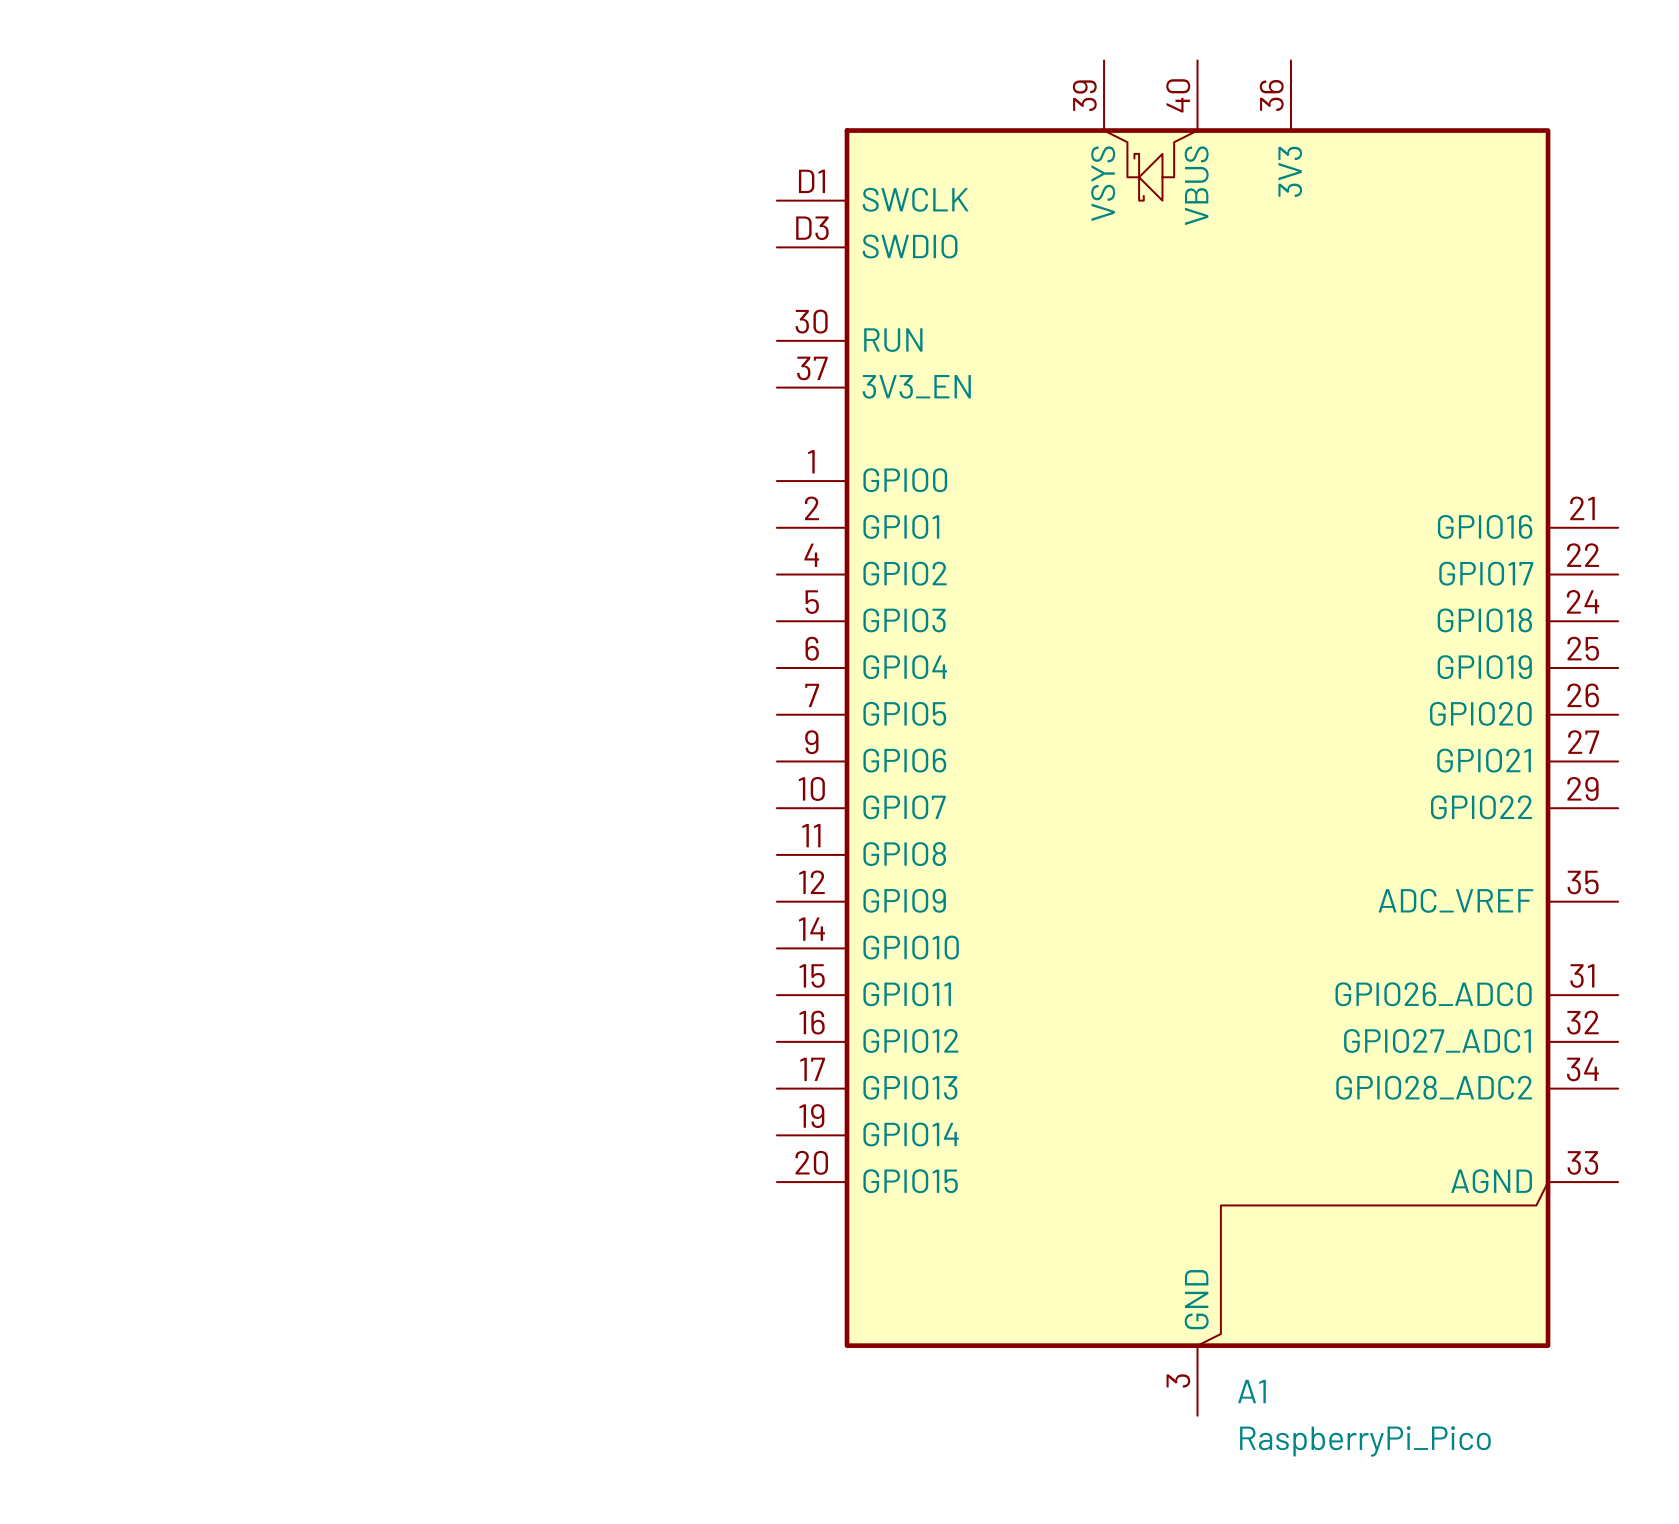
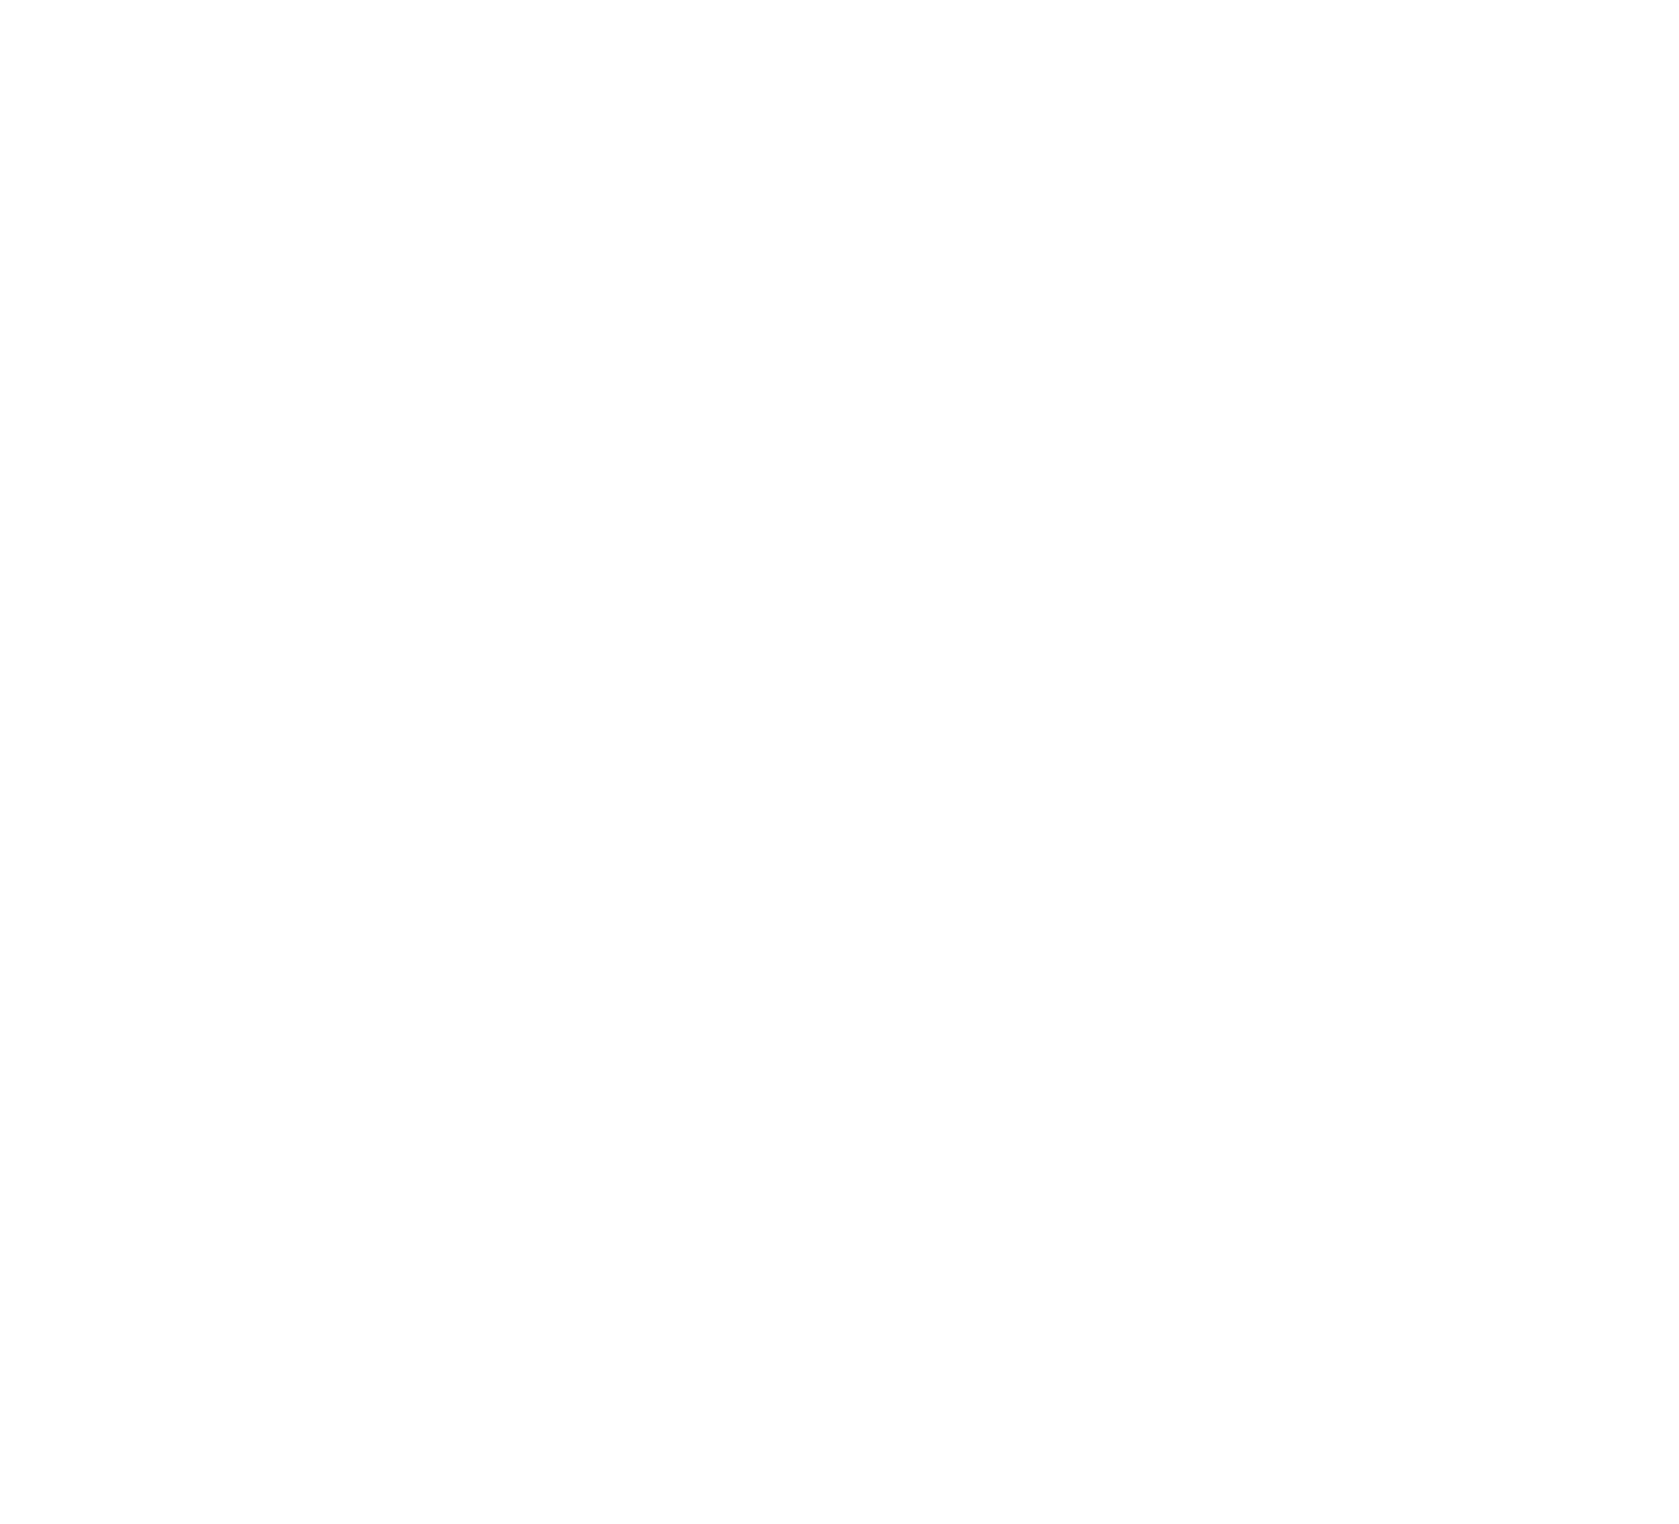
A1: RaspberryPi_Pico (1197, 738) -> none

